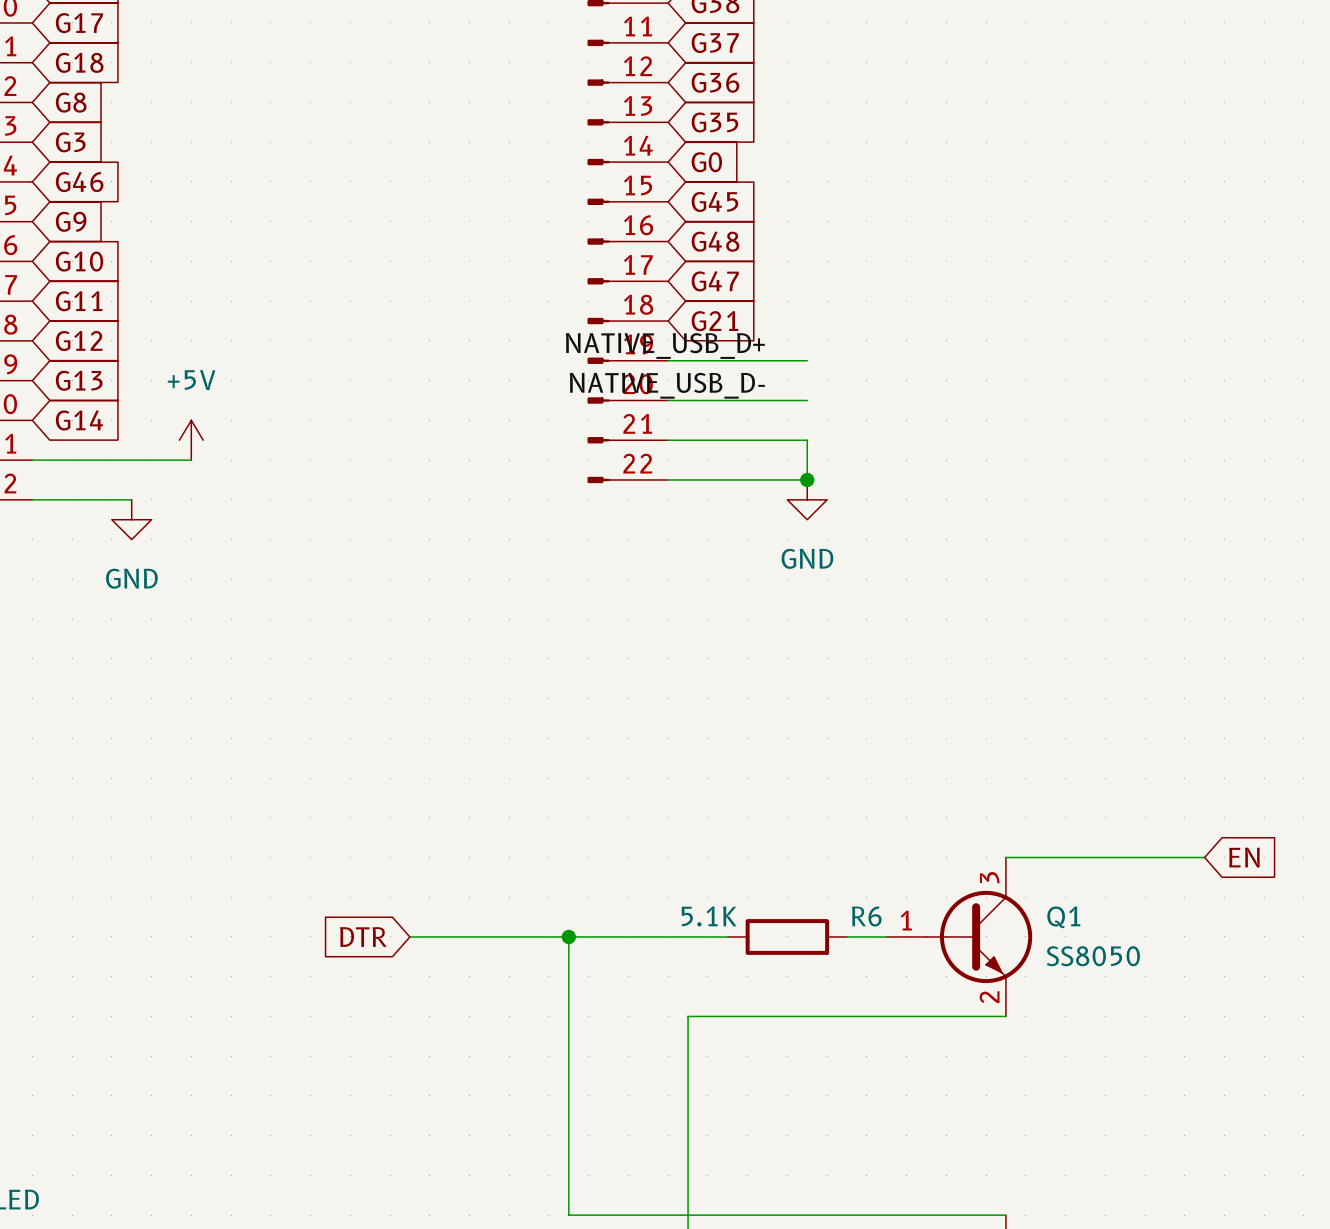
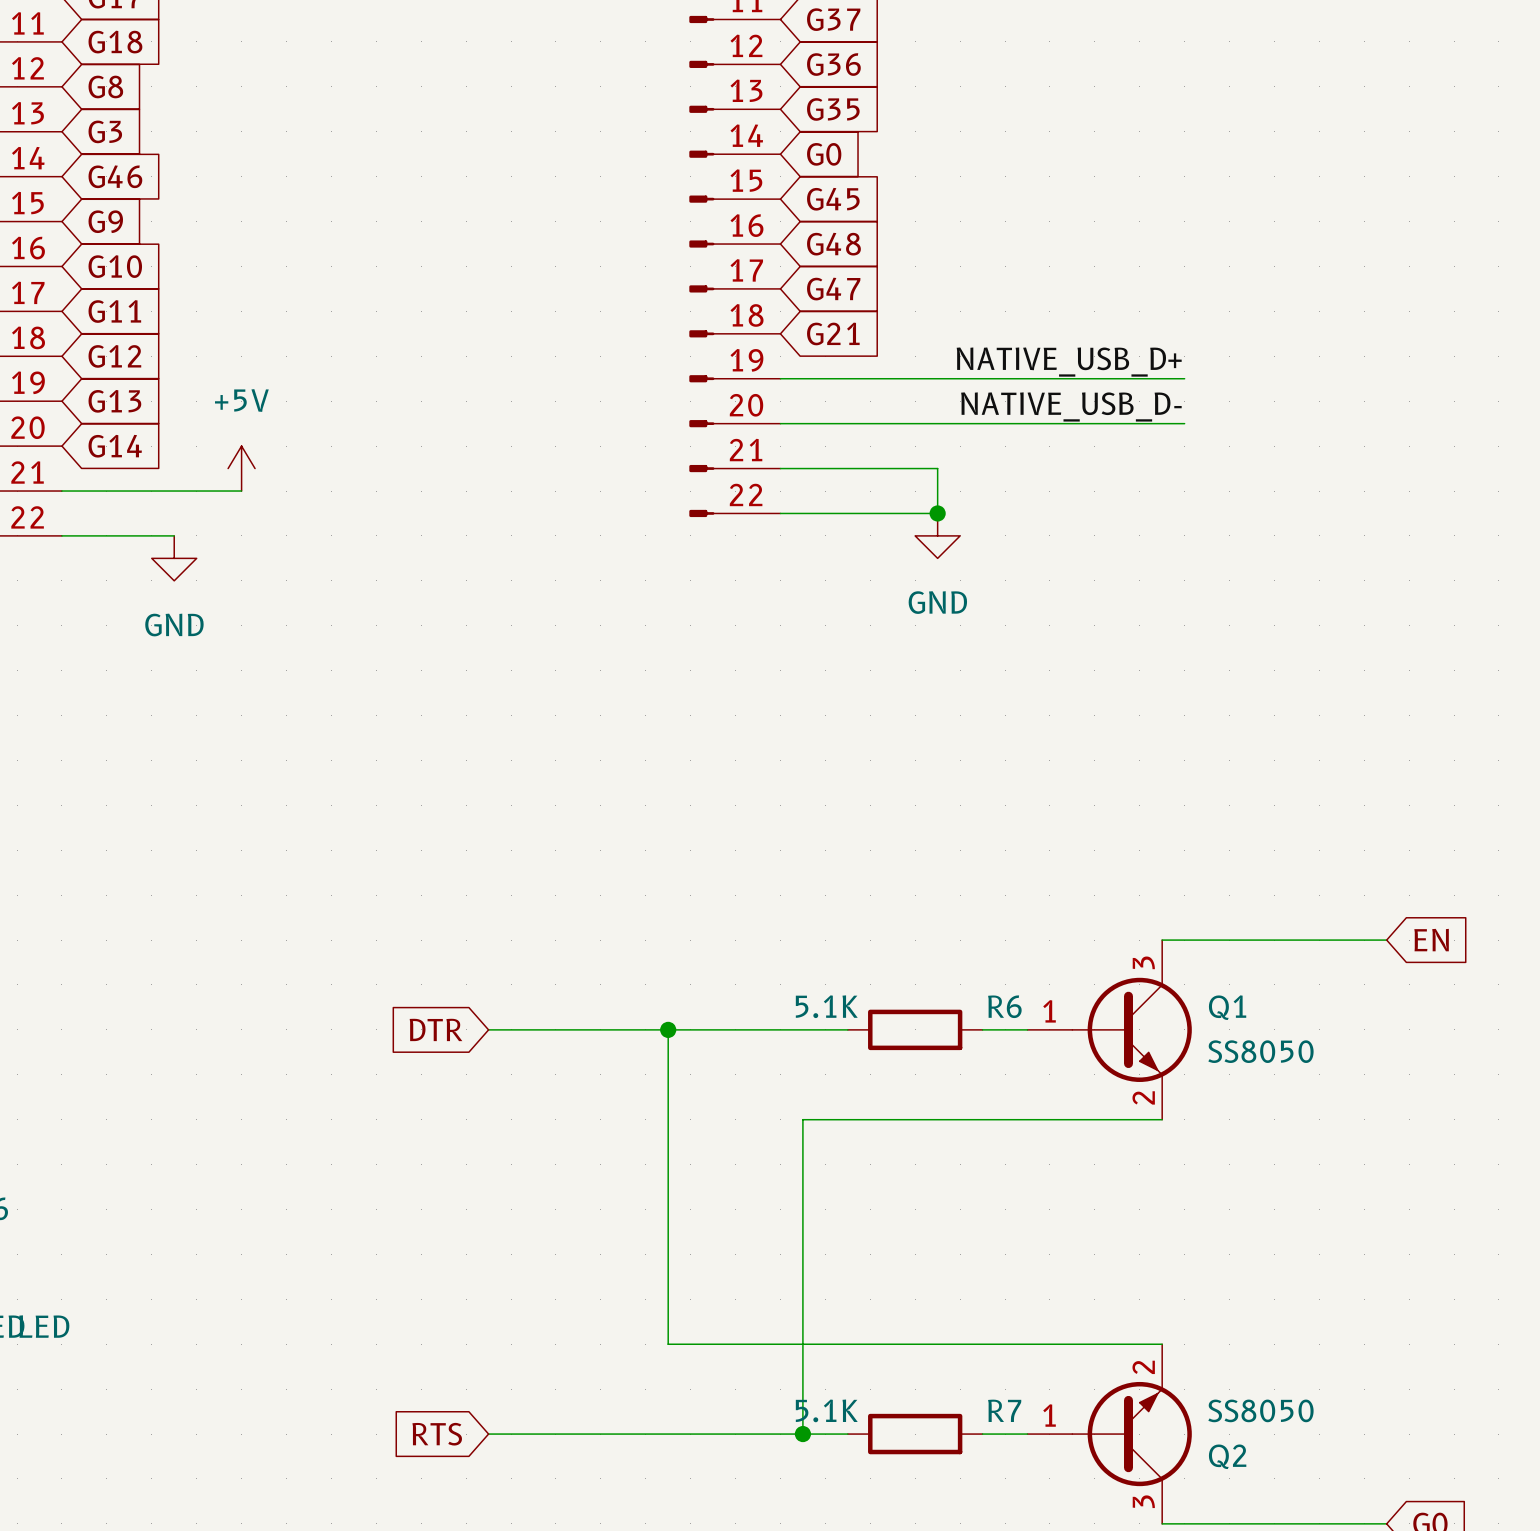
label position: NATIVE_USB_D+ (665, 346) -> NATIVE_USB_D+ (1069, 362)
wire: none -> (937, 378) (1184, 378)
label position: NATIVE_USB_D- (667, 385) -> NATIVE_USB_D- (1071, 406)
wire: none -> (937, 423) (1184, 423)

